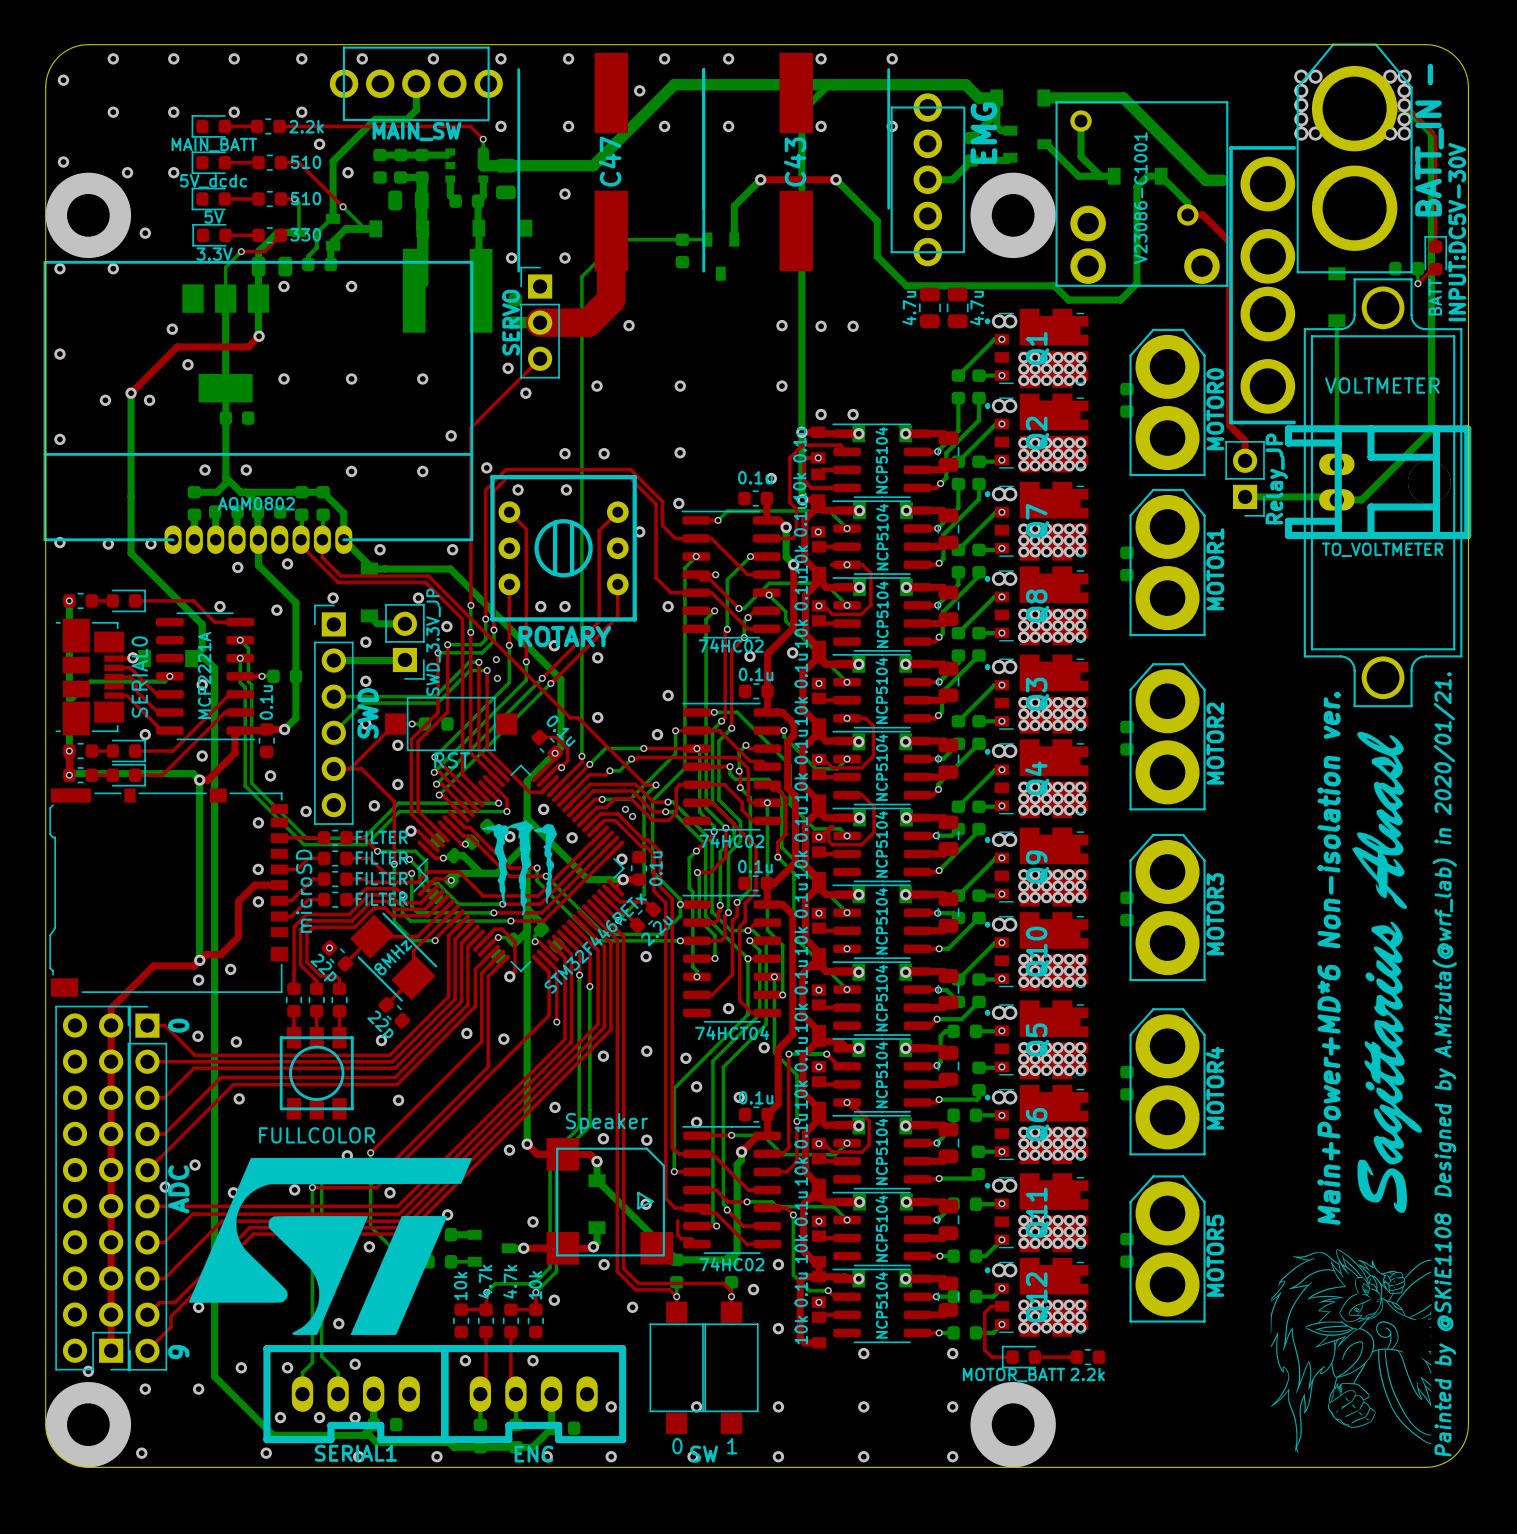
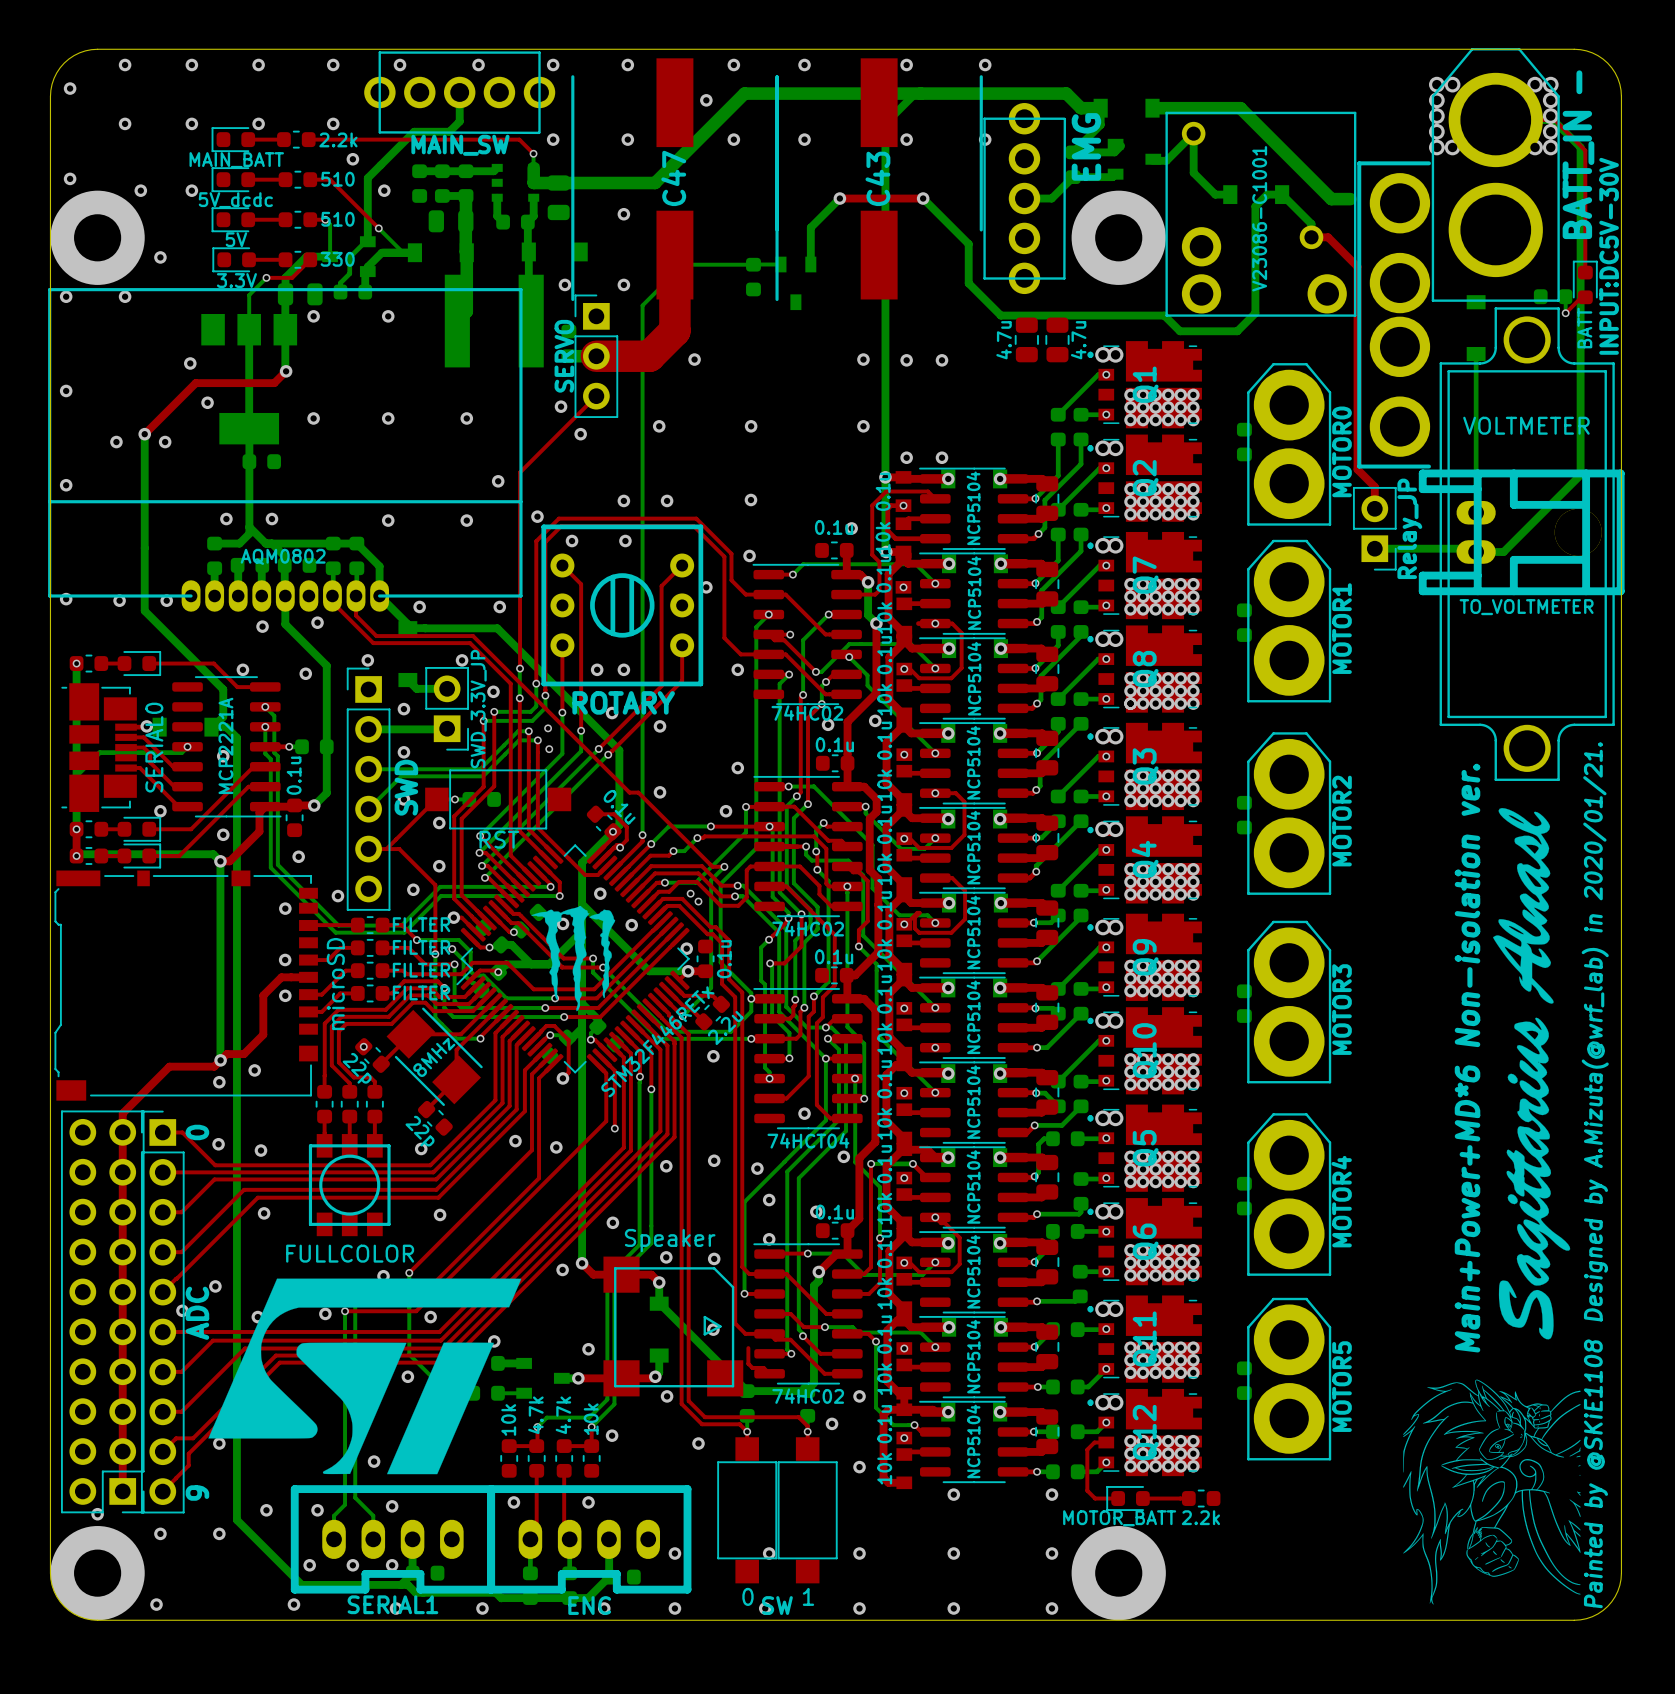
bottom track: (996, 113) (996, 126) (1001, 130) (1010, 130) -> none
bottom track: none -> (1193, 133) (1166, 160) (1152, 160)
bottom track: none -> (1121, 145) (1114, 152) (1073, 152)
bottom track: (1044, 144) (1078, 176) (1100, 176) -> none

